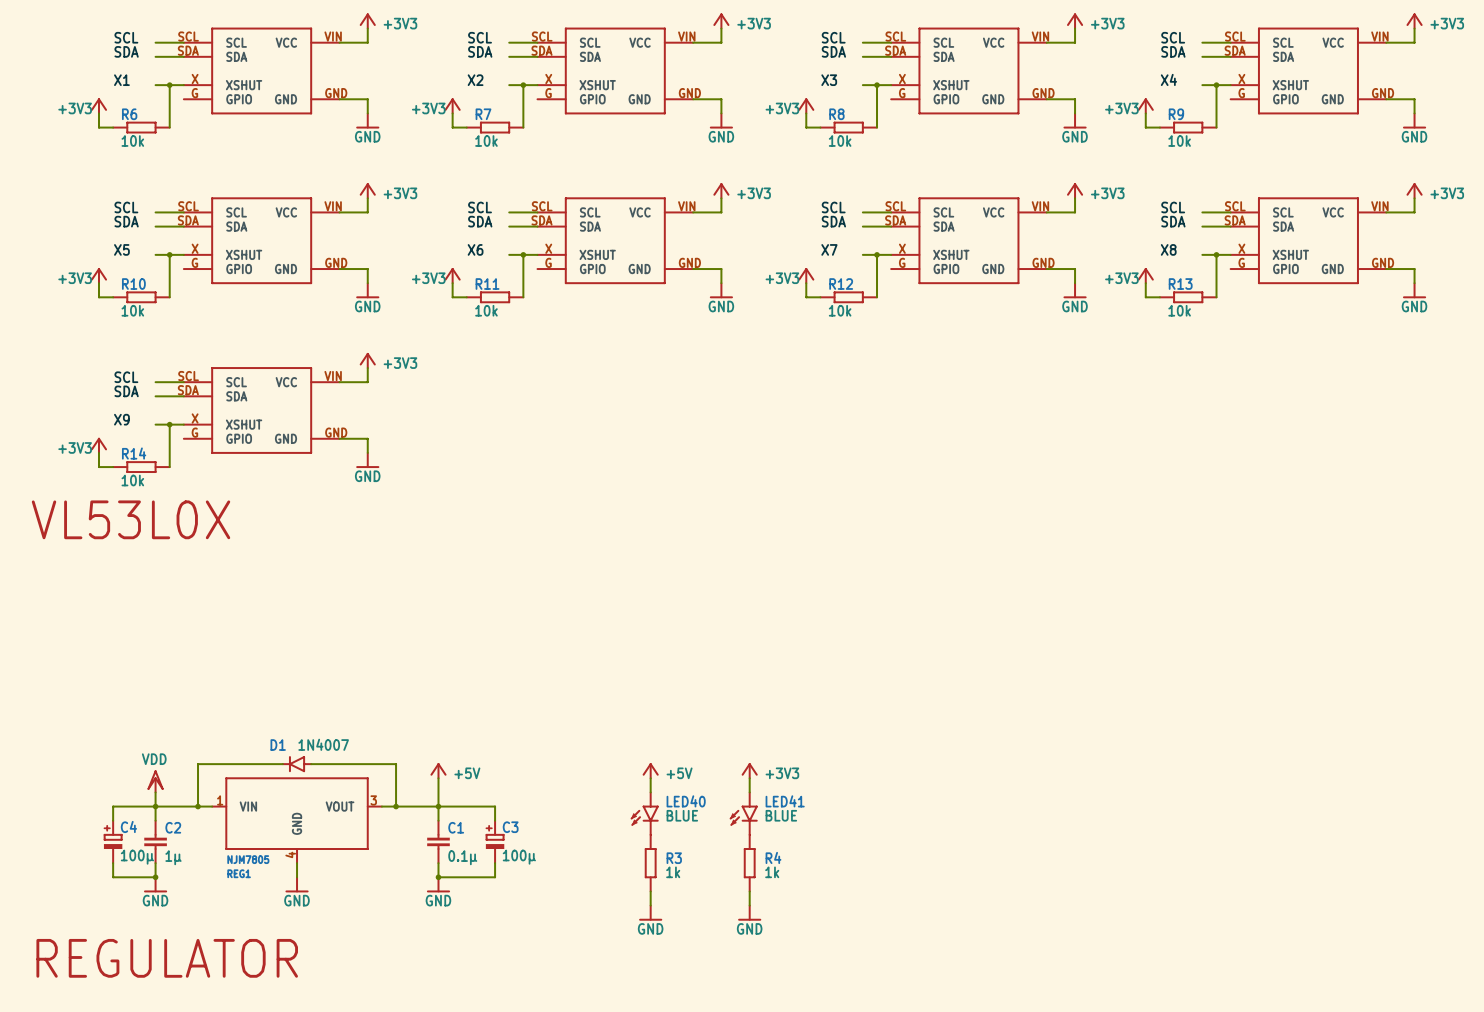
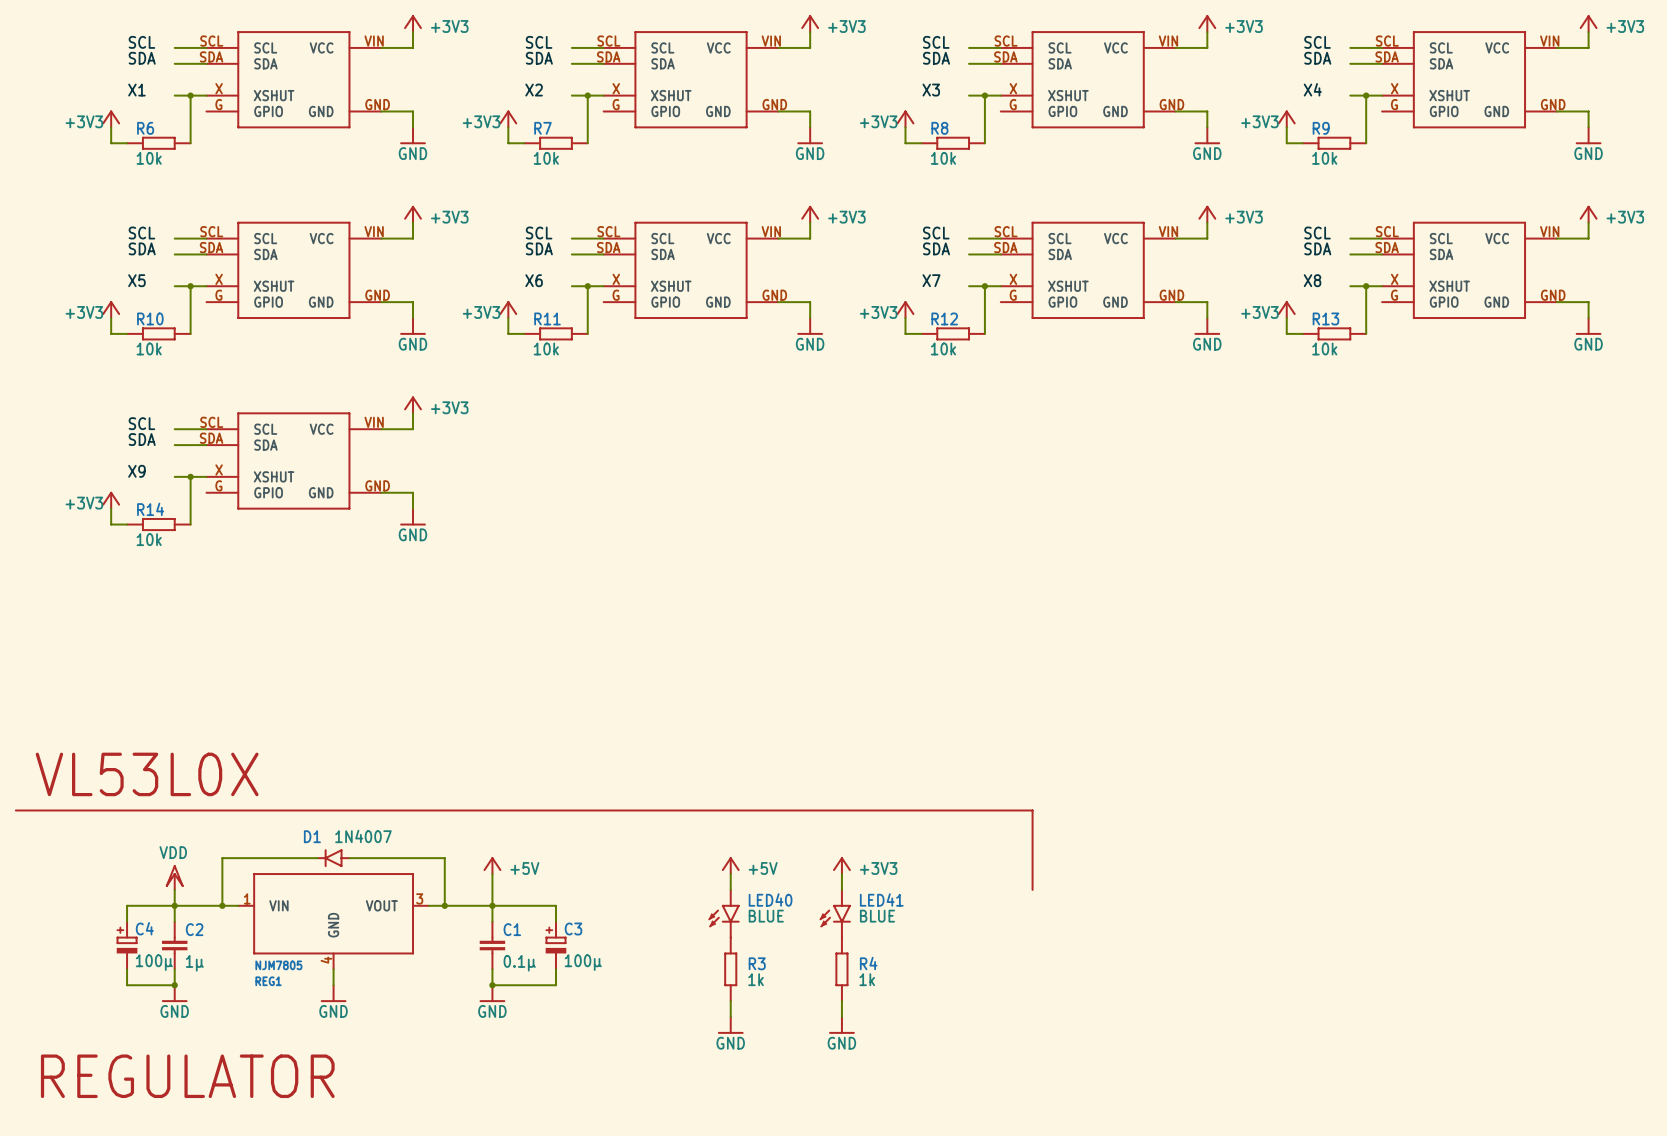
text: VL53L0X (131, 519) -> none
text: none -> VL53L0X (147, 774)
line: none -> (15, 810) (1032, 810) (1032, 889)

